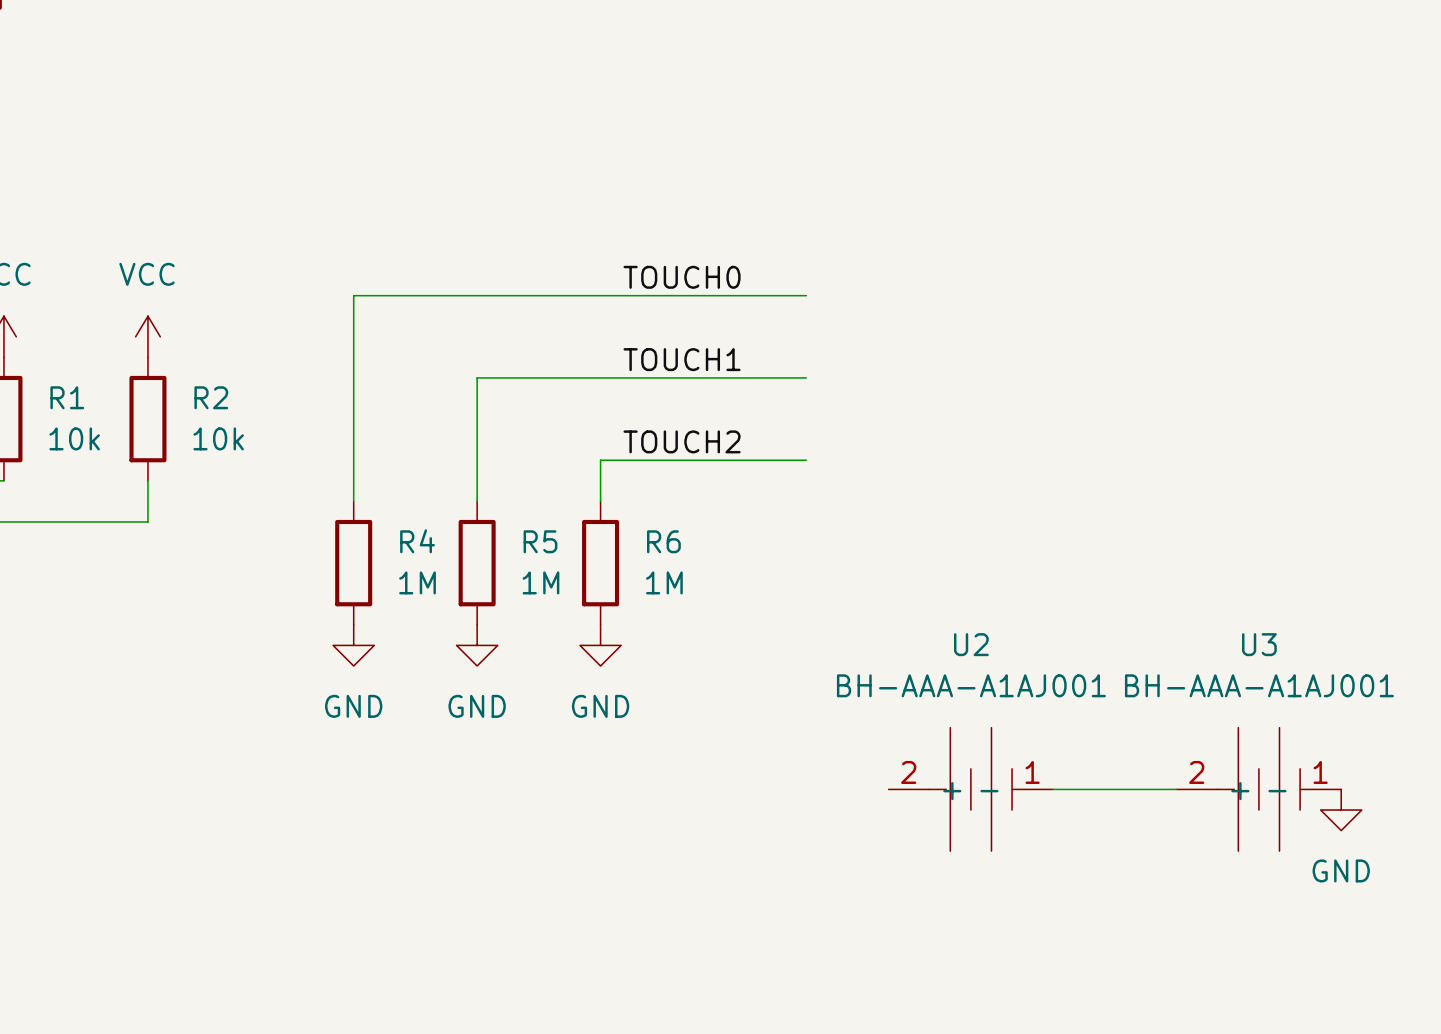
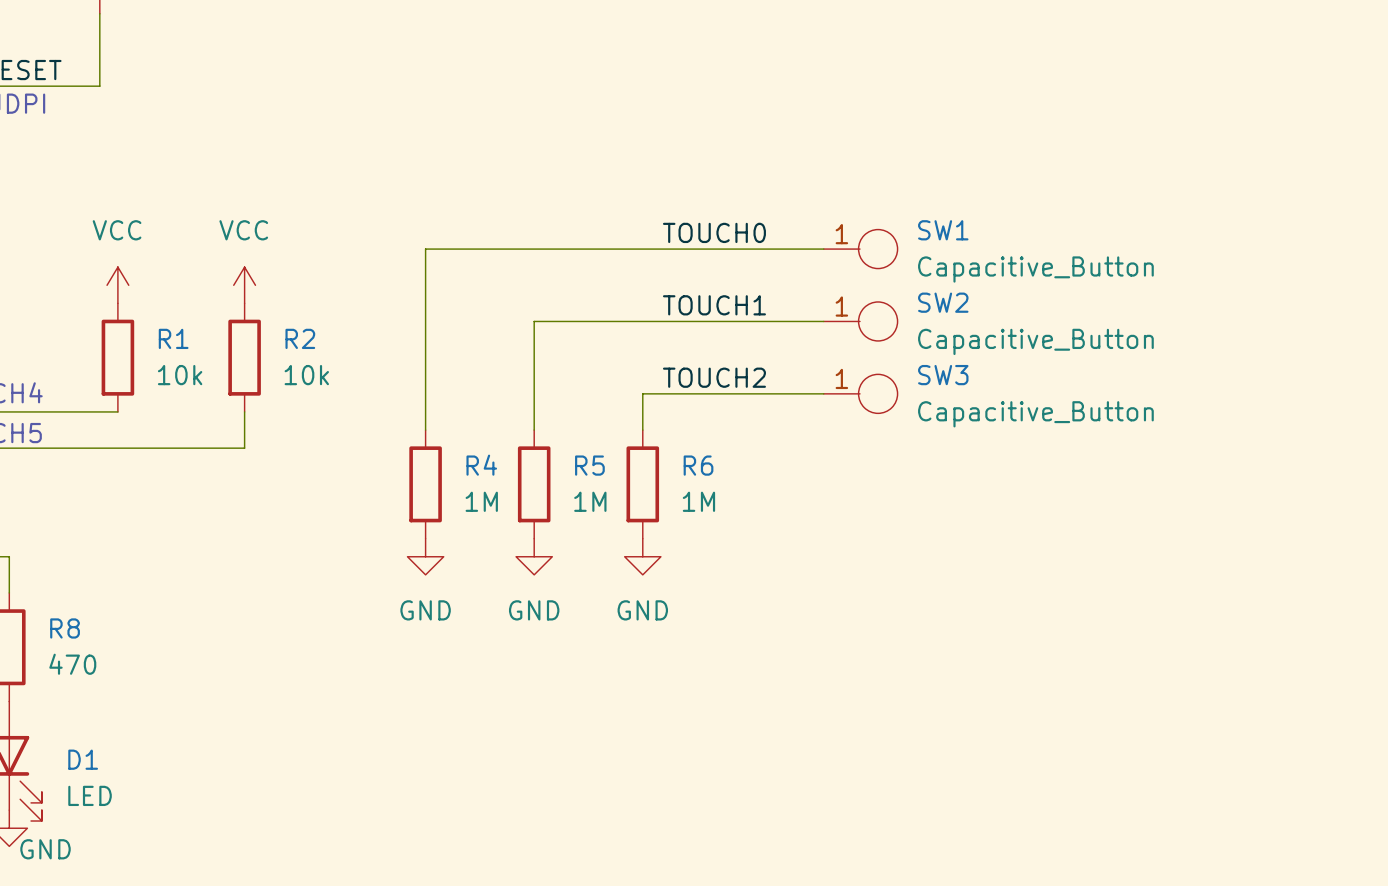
SW1: none -> Capacitive_Button (860, 249)
SW2: none -> Capacitive_Button (860, 321)
SW3: none -> Capacitive_Button (860, 393)
U2: BH-AAA-A1AJ001 (970, 789) -> none
wire: (1053, 789) (1176, 789) -> none
U3: BH-AAA-A1AJ001 (1258, 789) -> none
power symbol: GND (1341, 810) -> none

